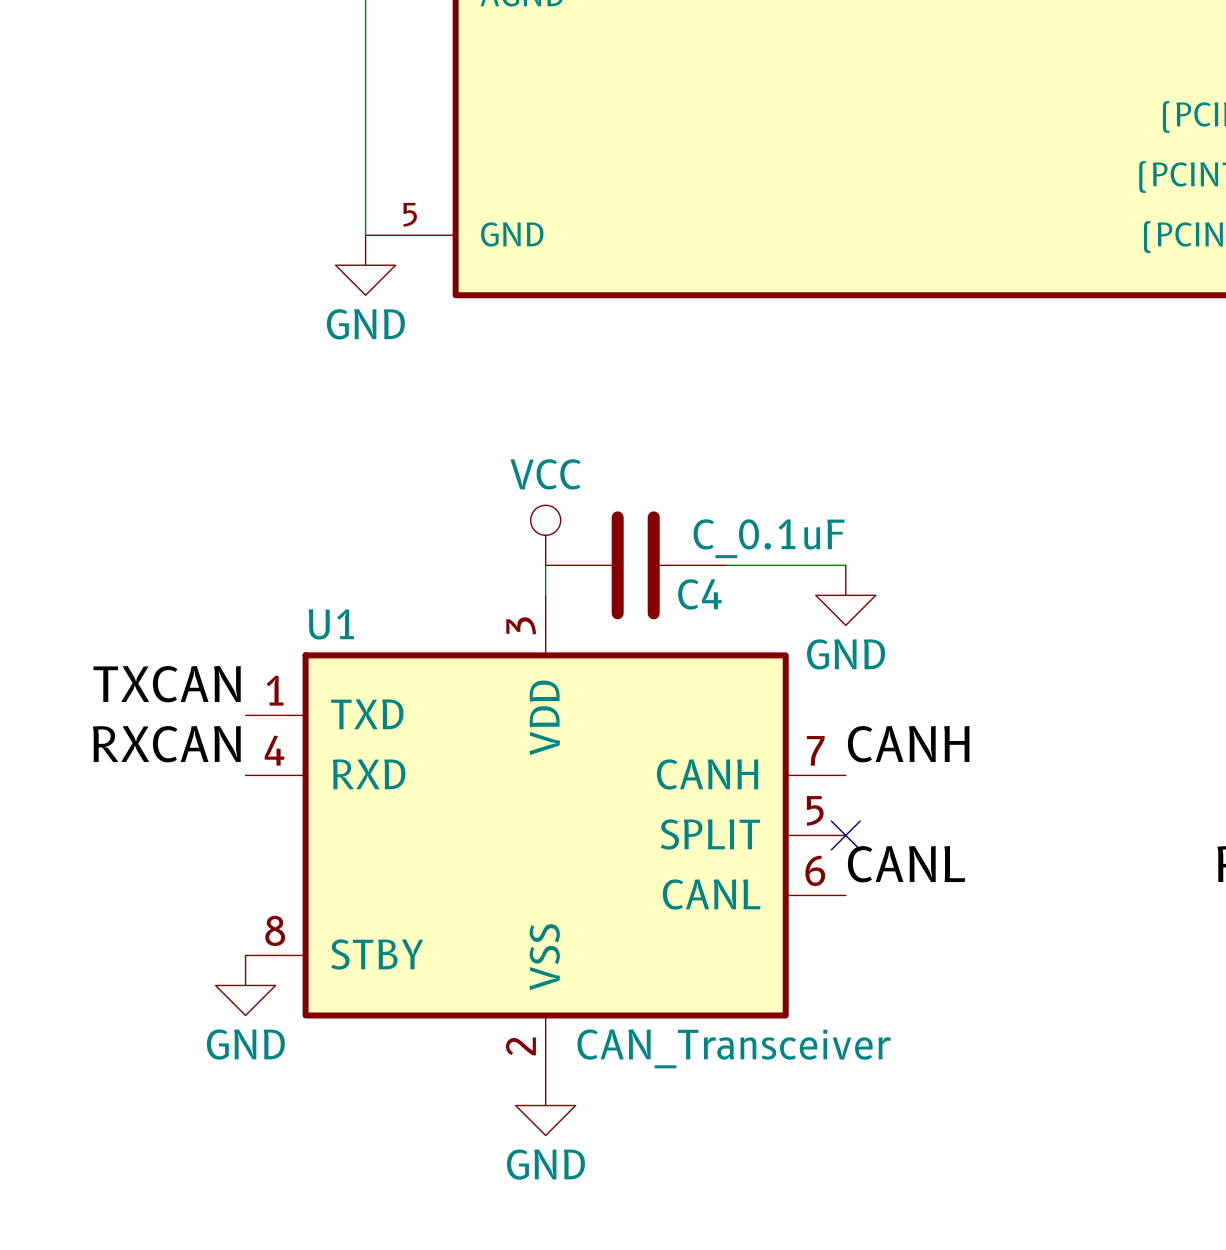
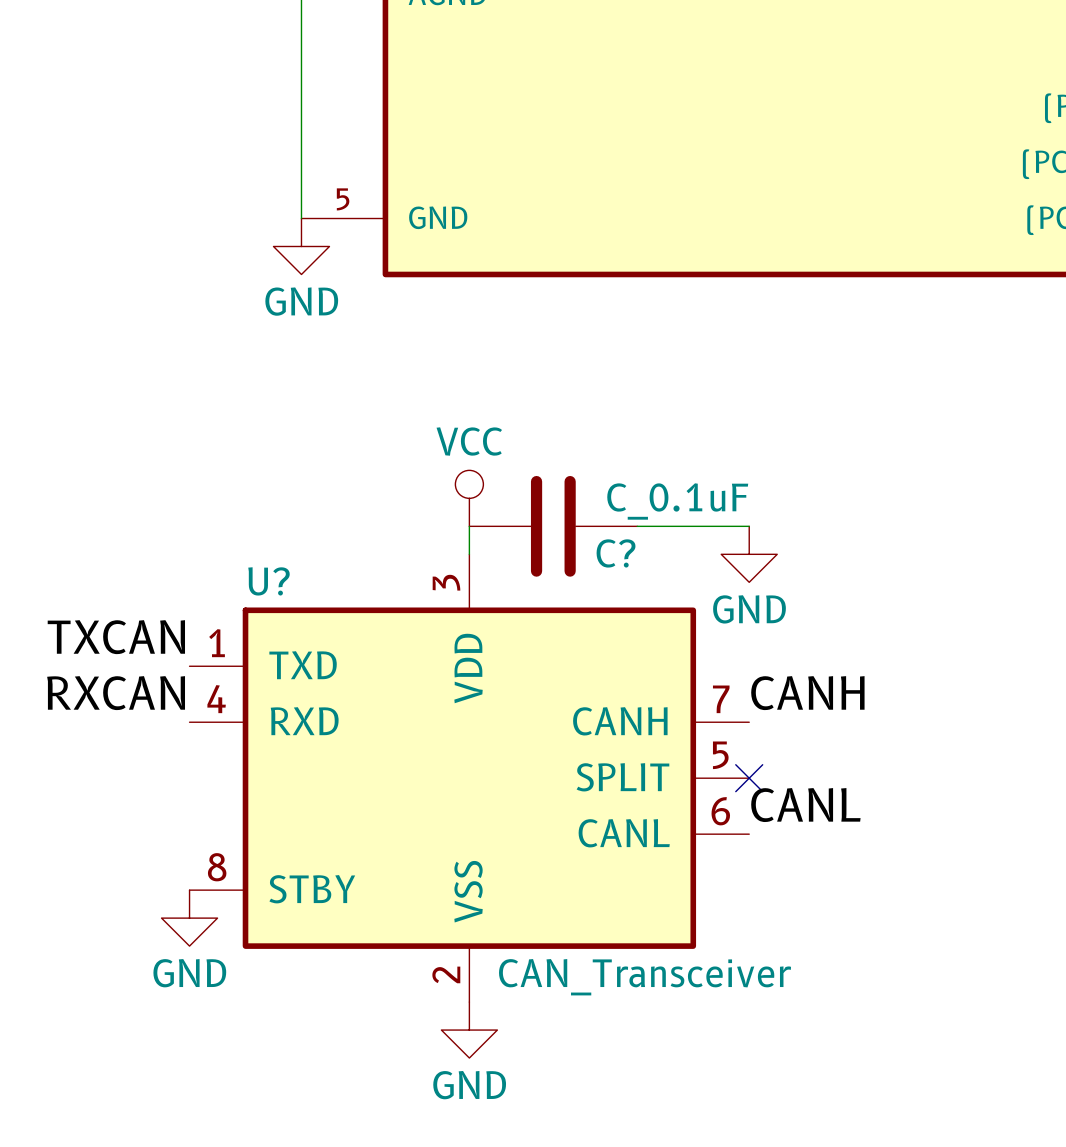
C4 name: C4 (699, 594) -> C? (616, 553)
U1 name: U1 (331, 624) -> U? (268, 581)

